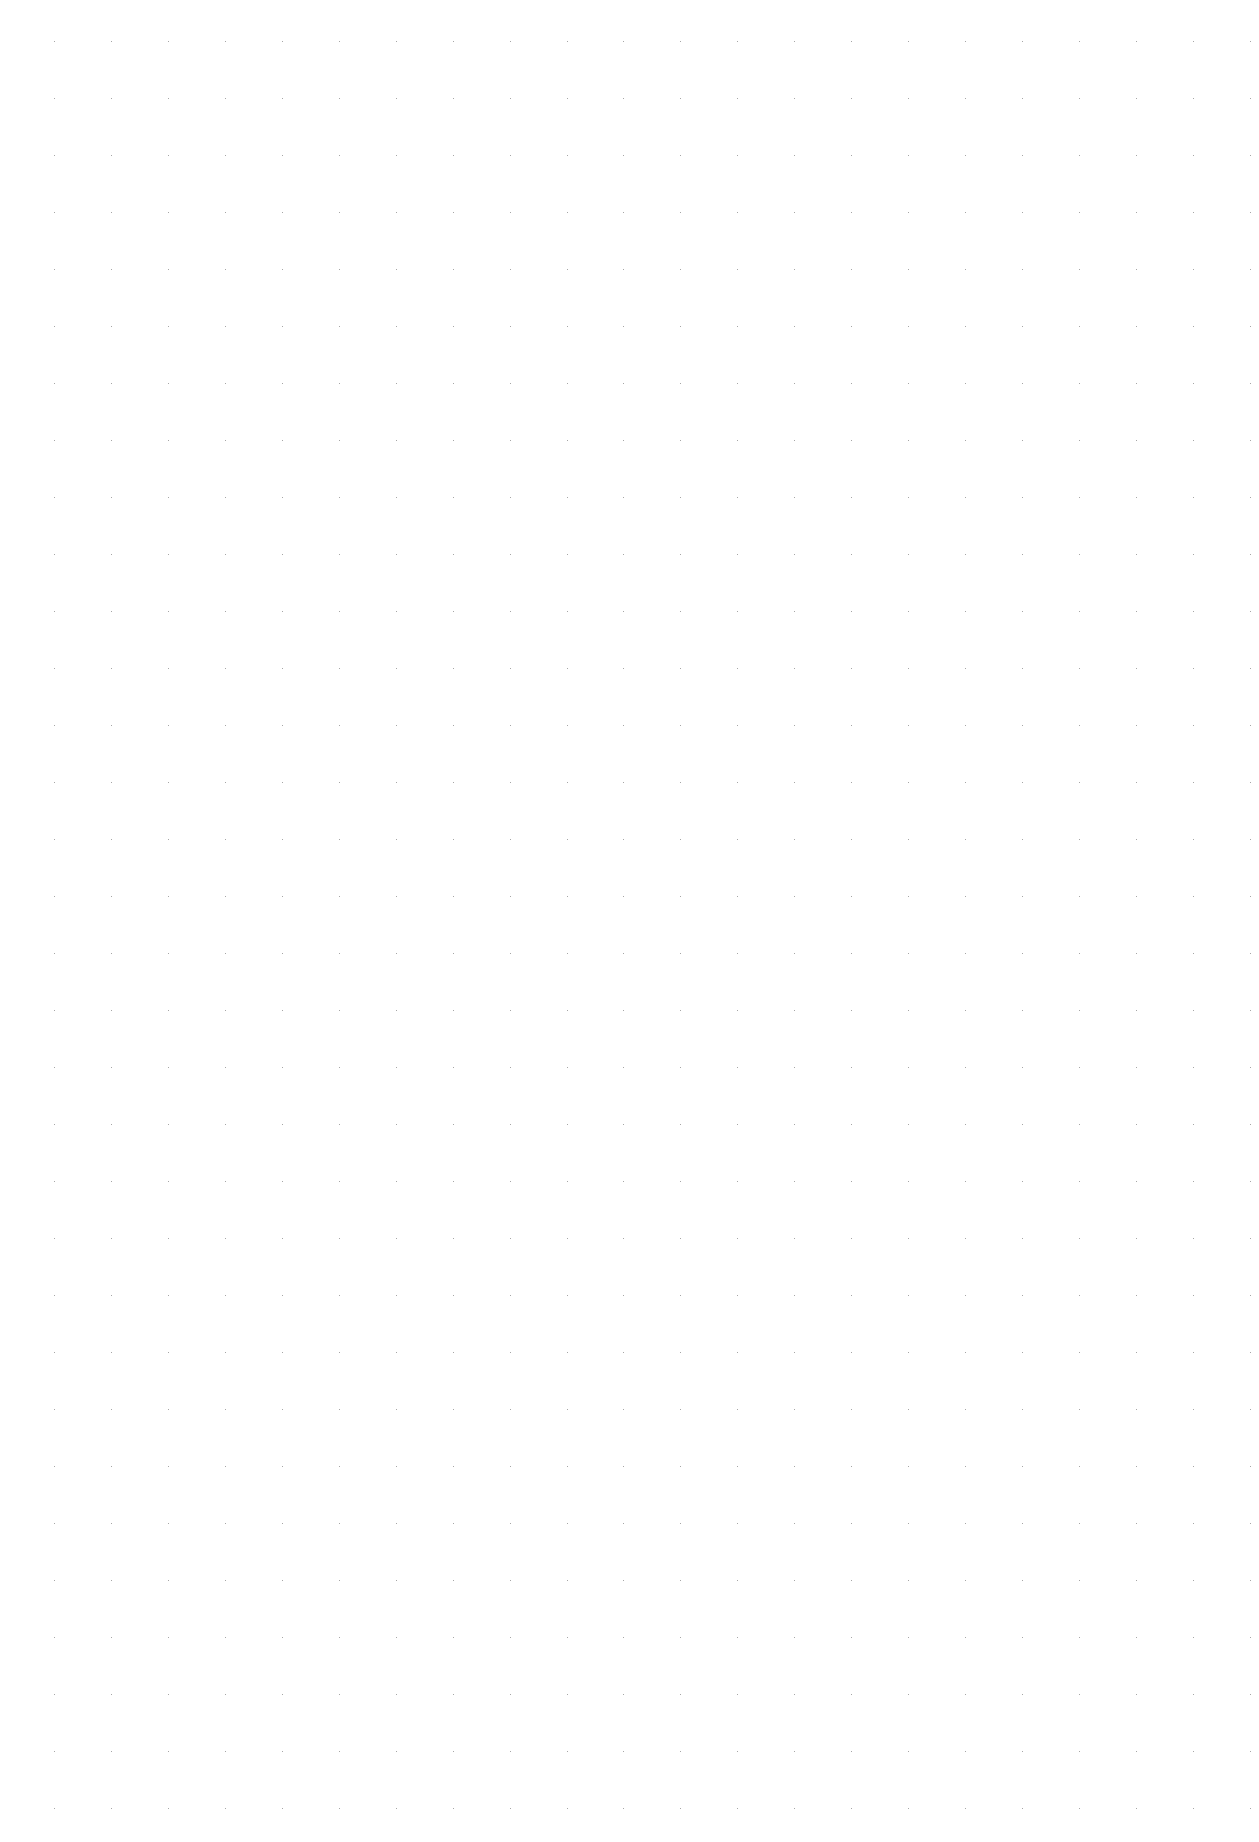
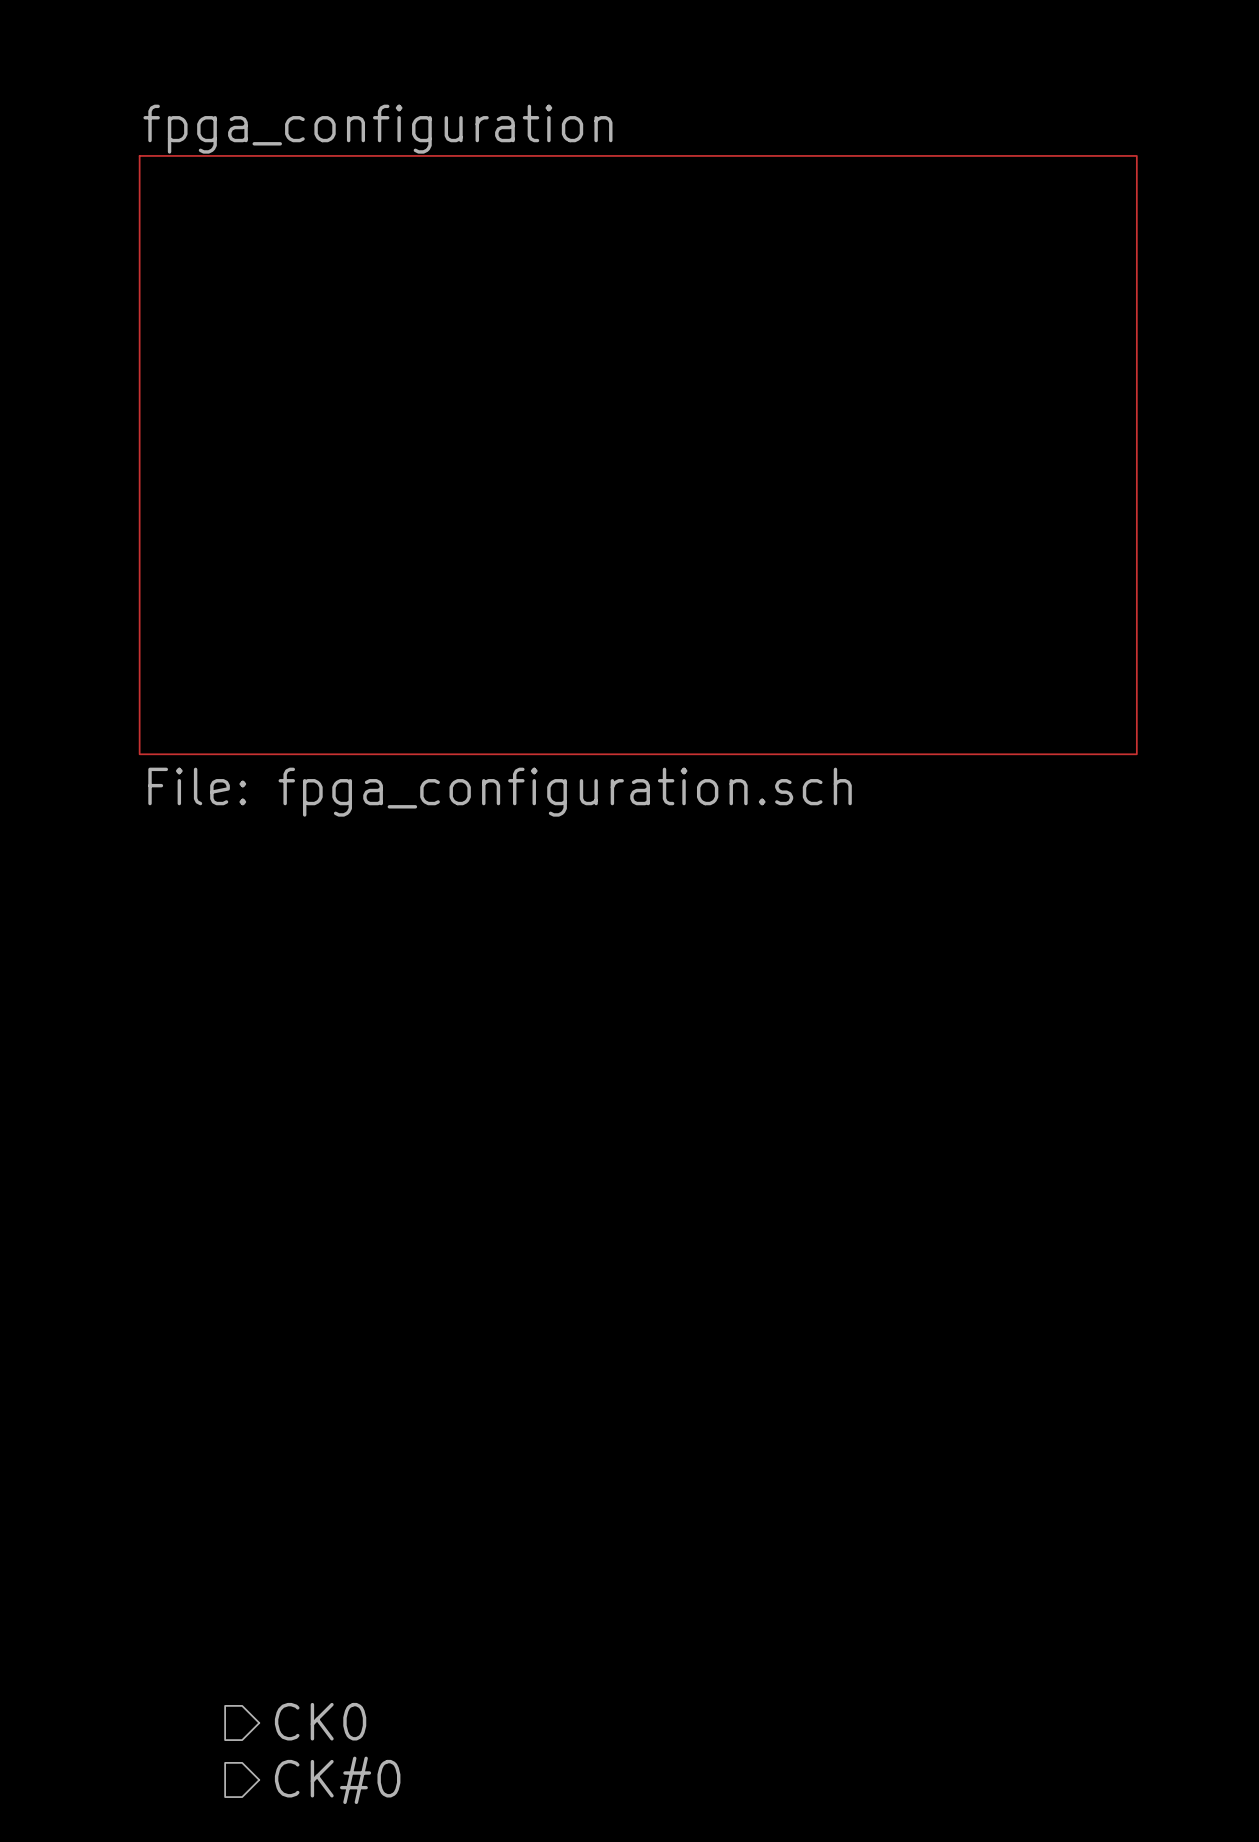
sheet fpga_configuration: none -> File: fpga_configuration.sch (638, 455)
sheet pin: none -> CK0 (320, 1721)
sheet pin: none -> CK#0 (337, 1780)

